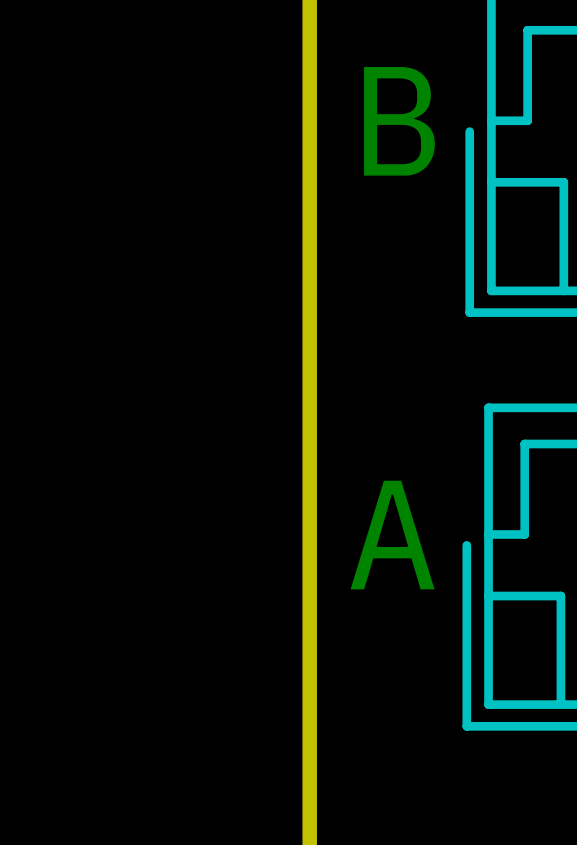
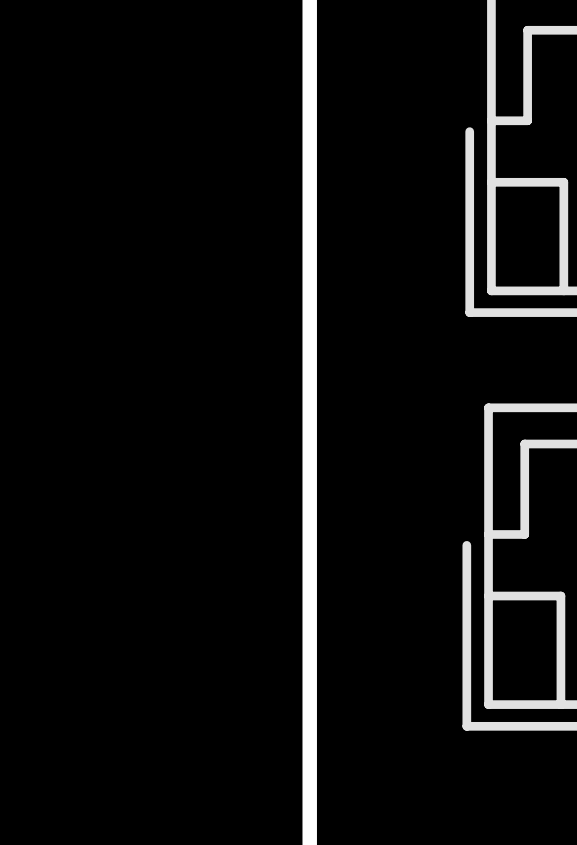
text: B (399, 121) -> none
text: A (392, 535) -> none

